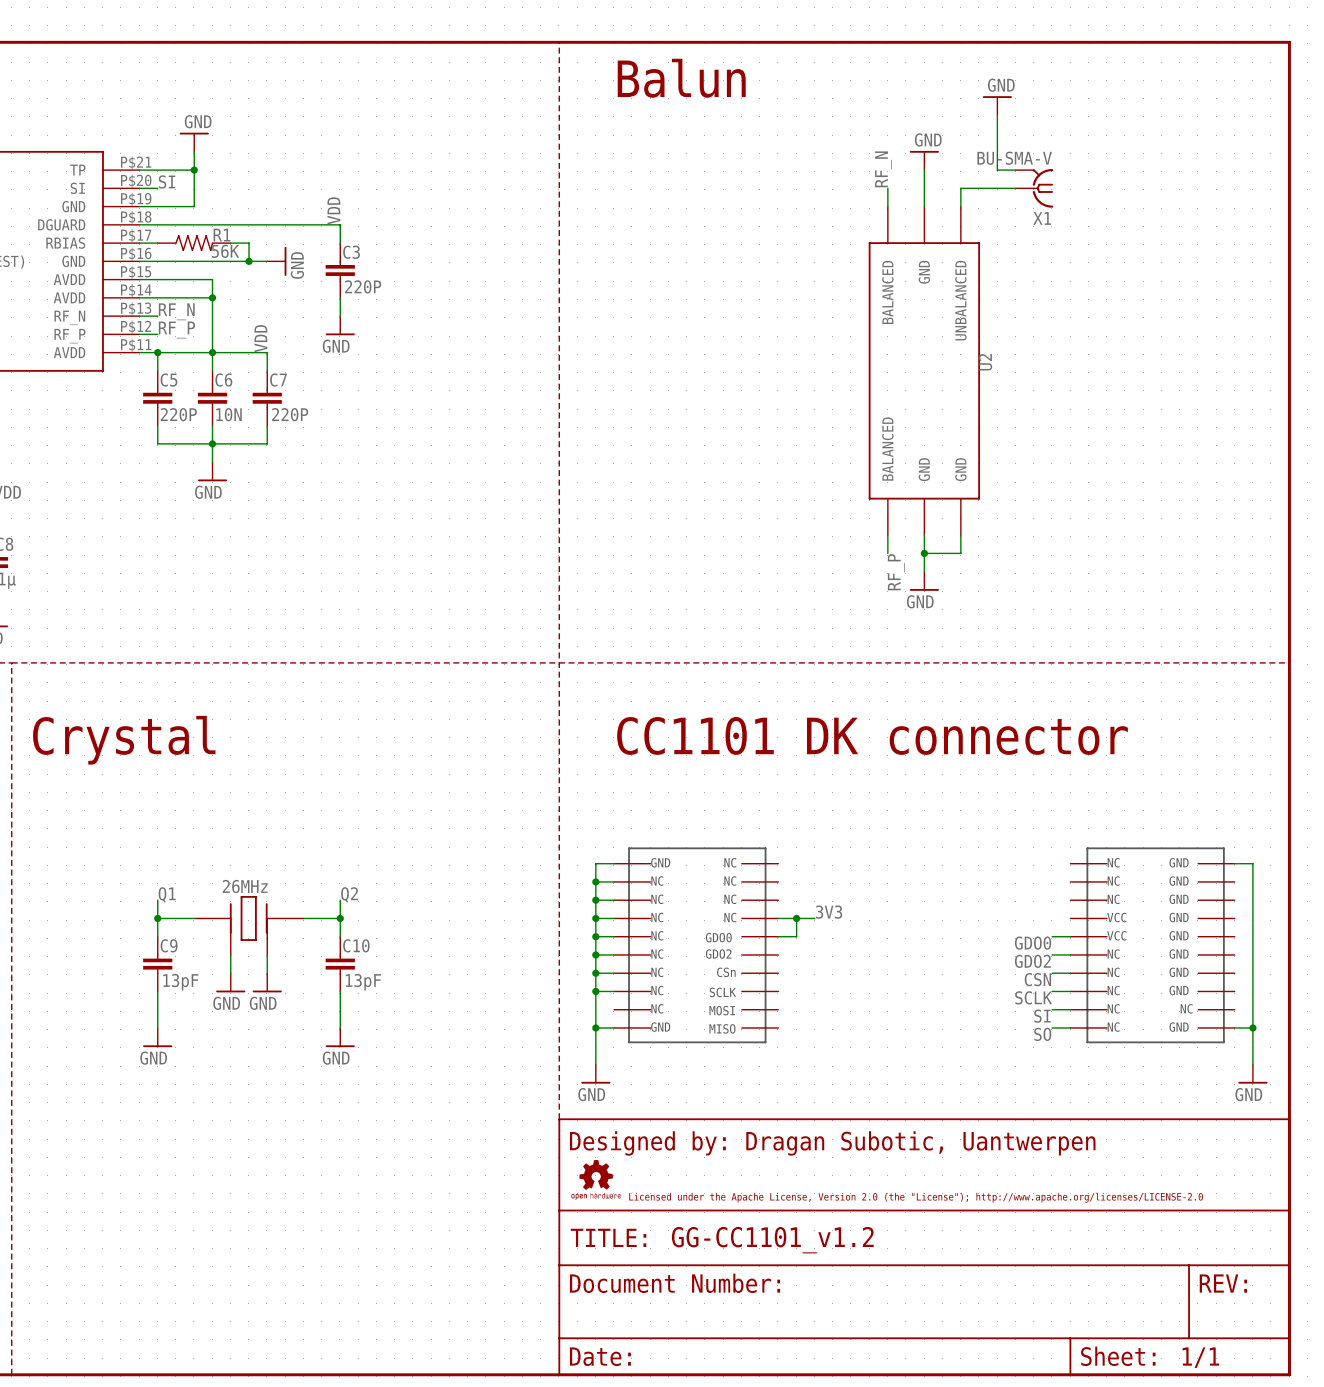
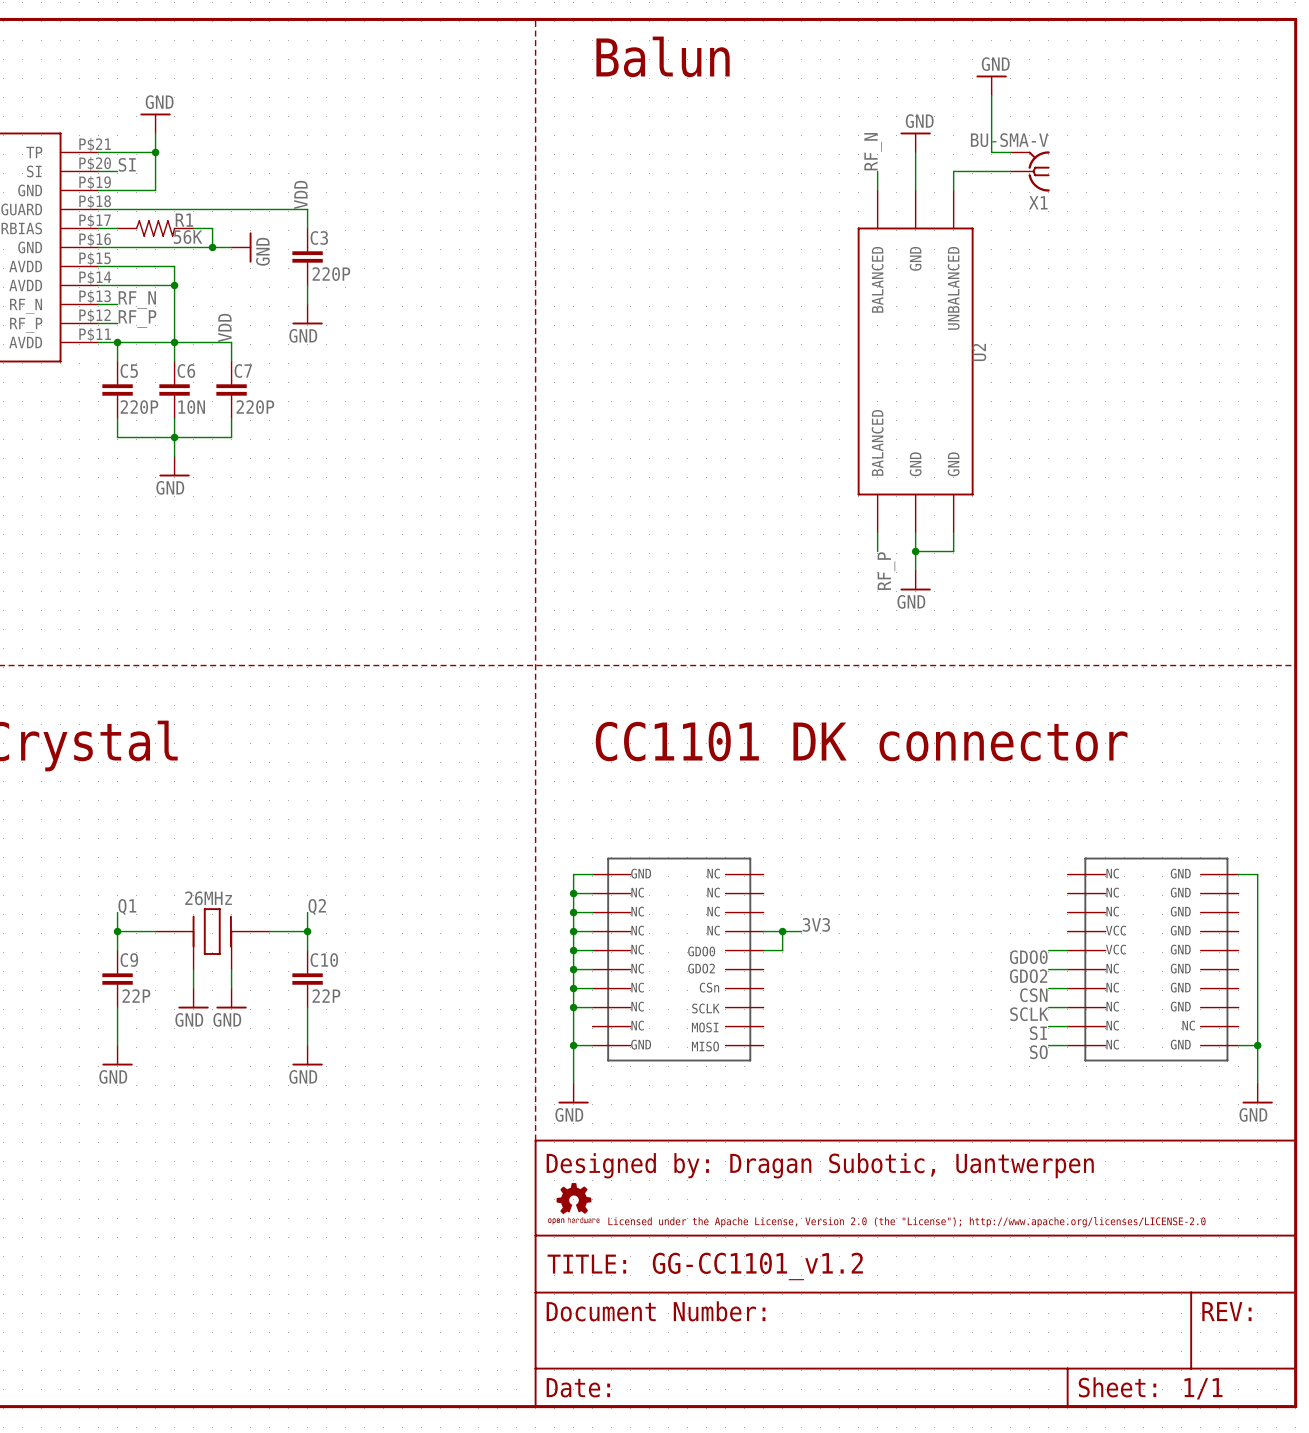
C9 value: 13pF (180, 982) -> 22P (136, 996)
C10 value: 13pF (363, 982) -> 22P (326, 996)

